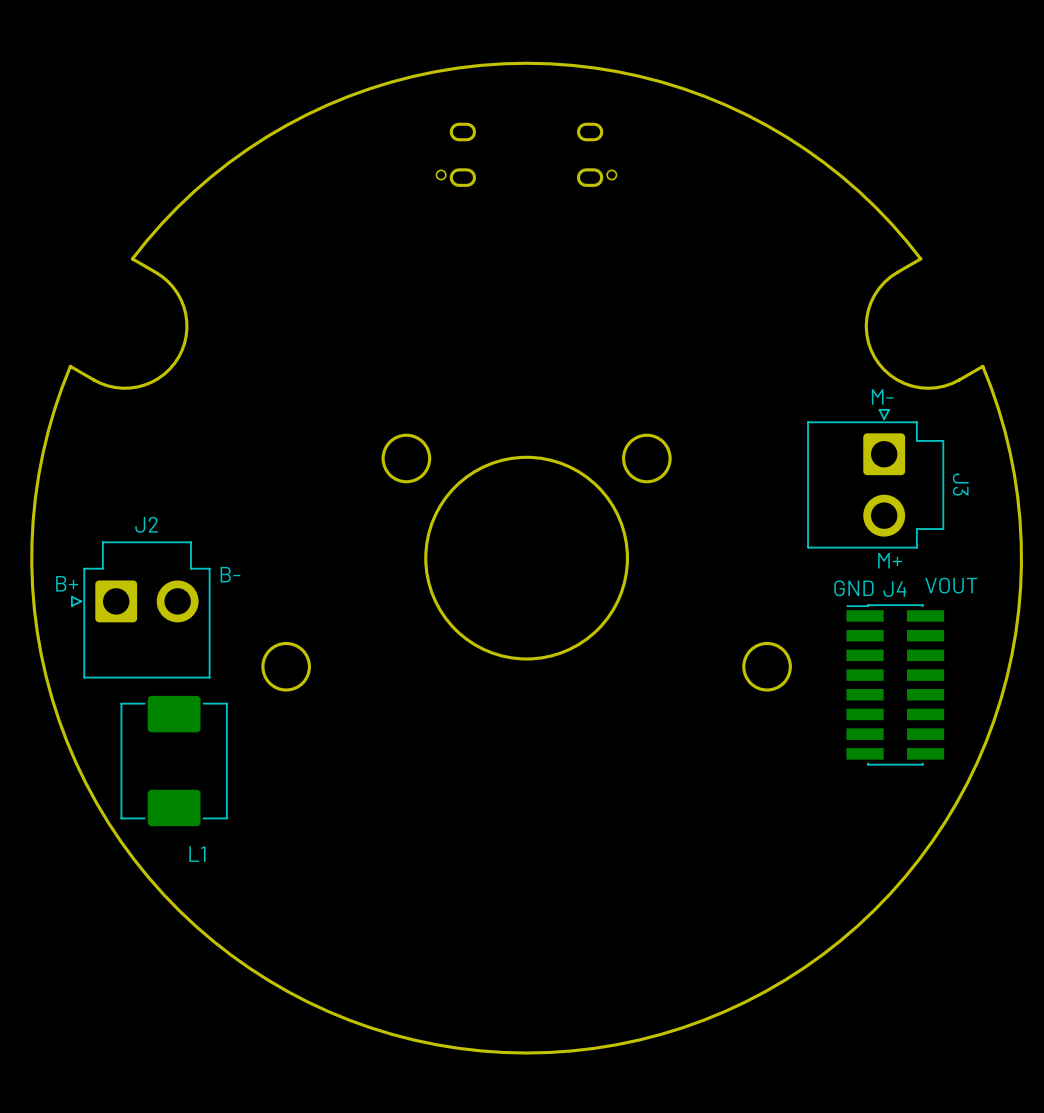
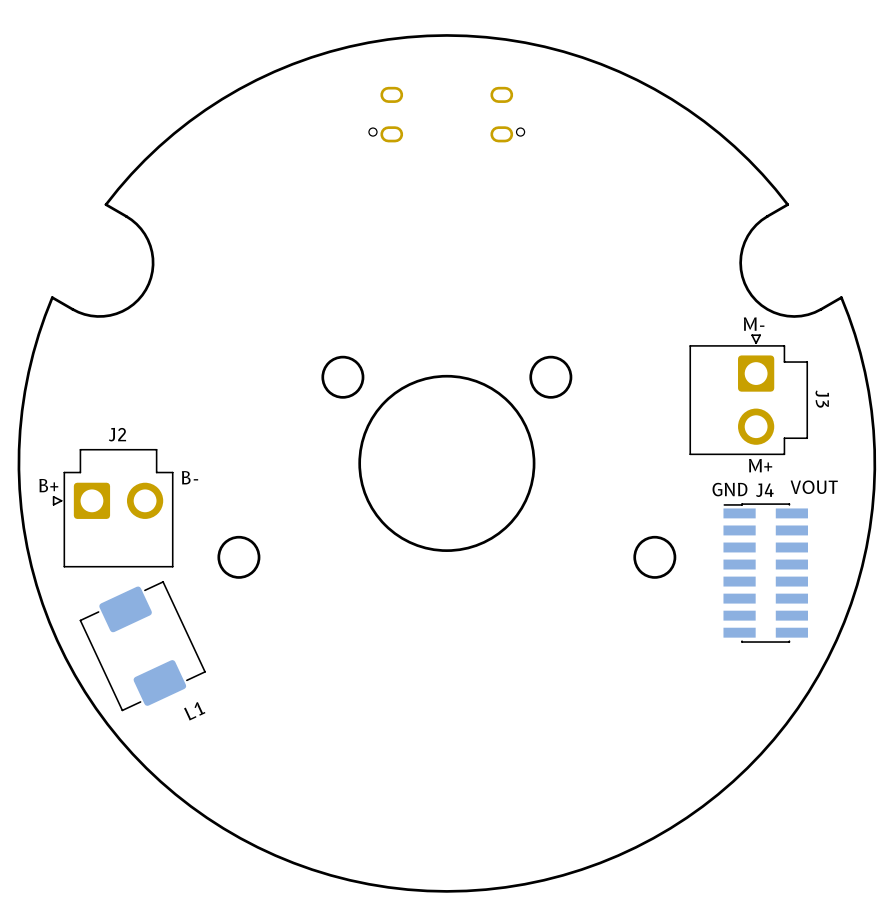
L1 rotation: 0° (174, 761) -> 25° counterclockwise (142, 646)

